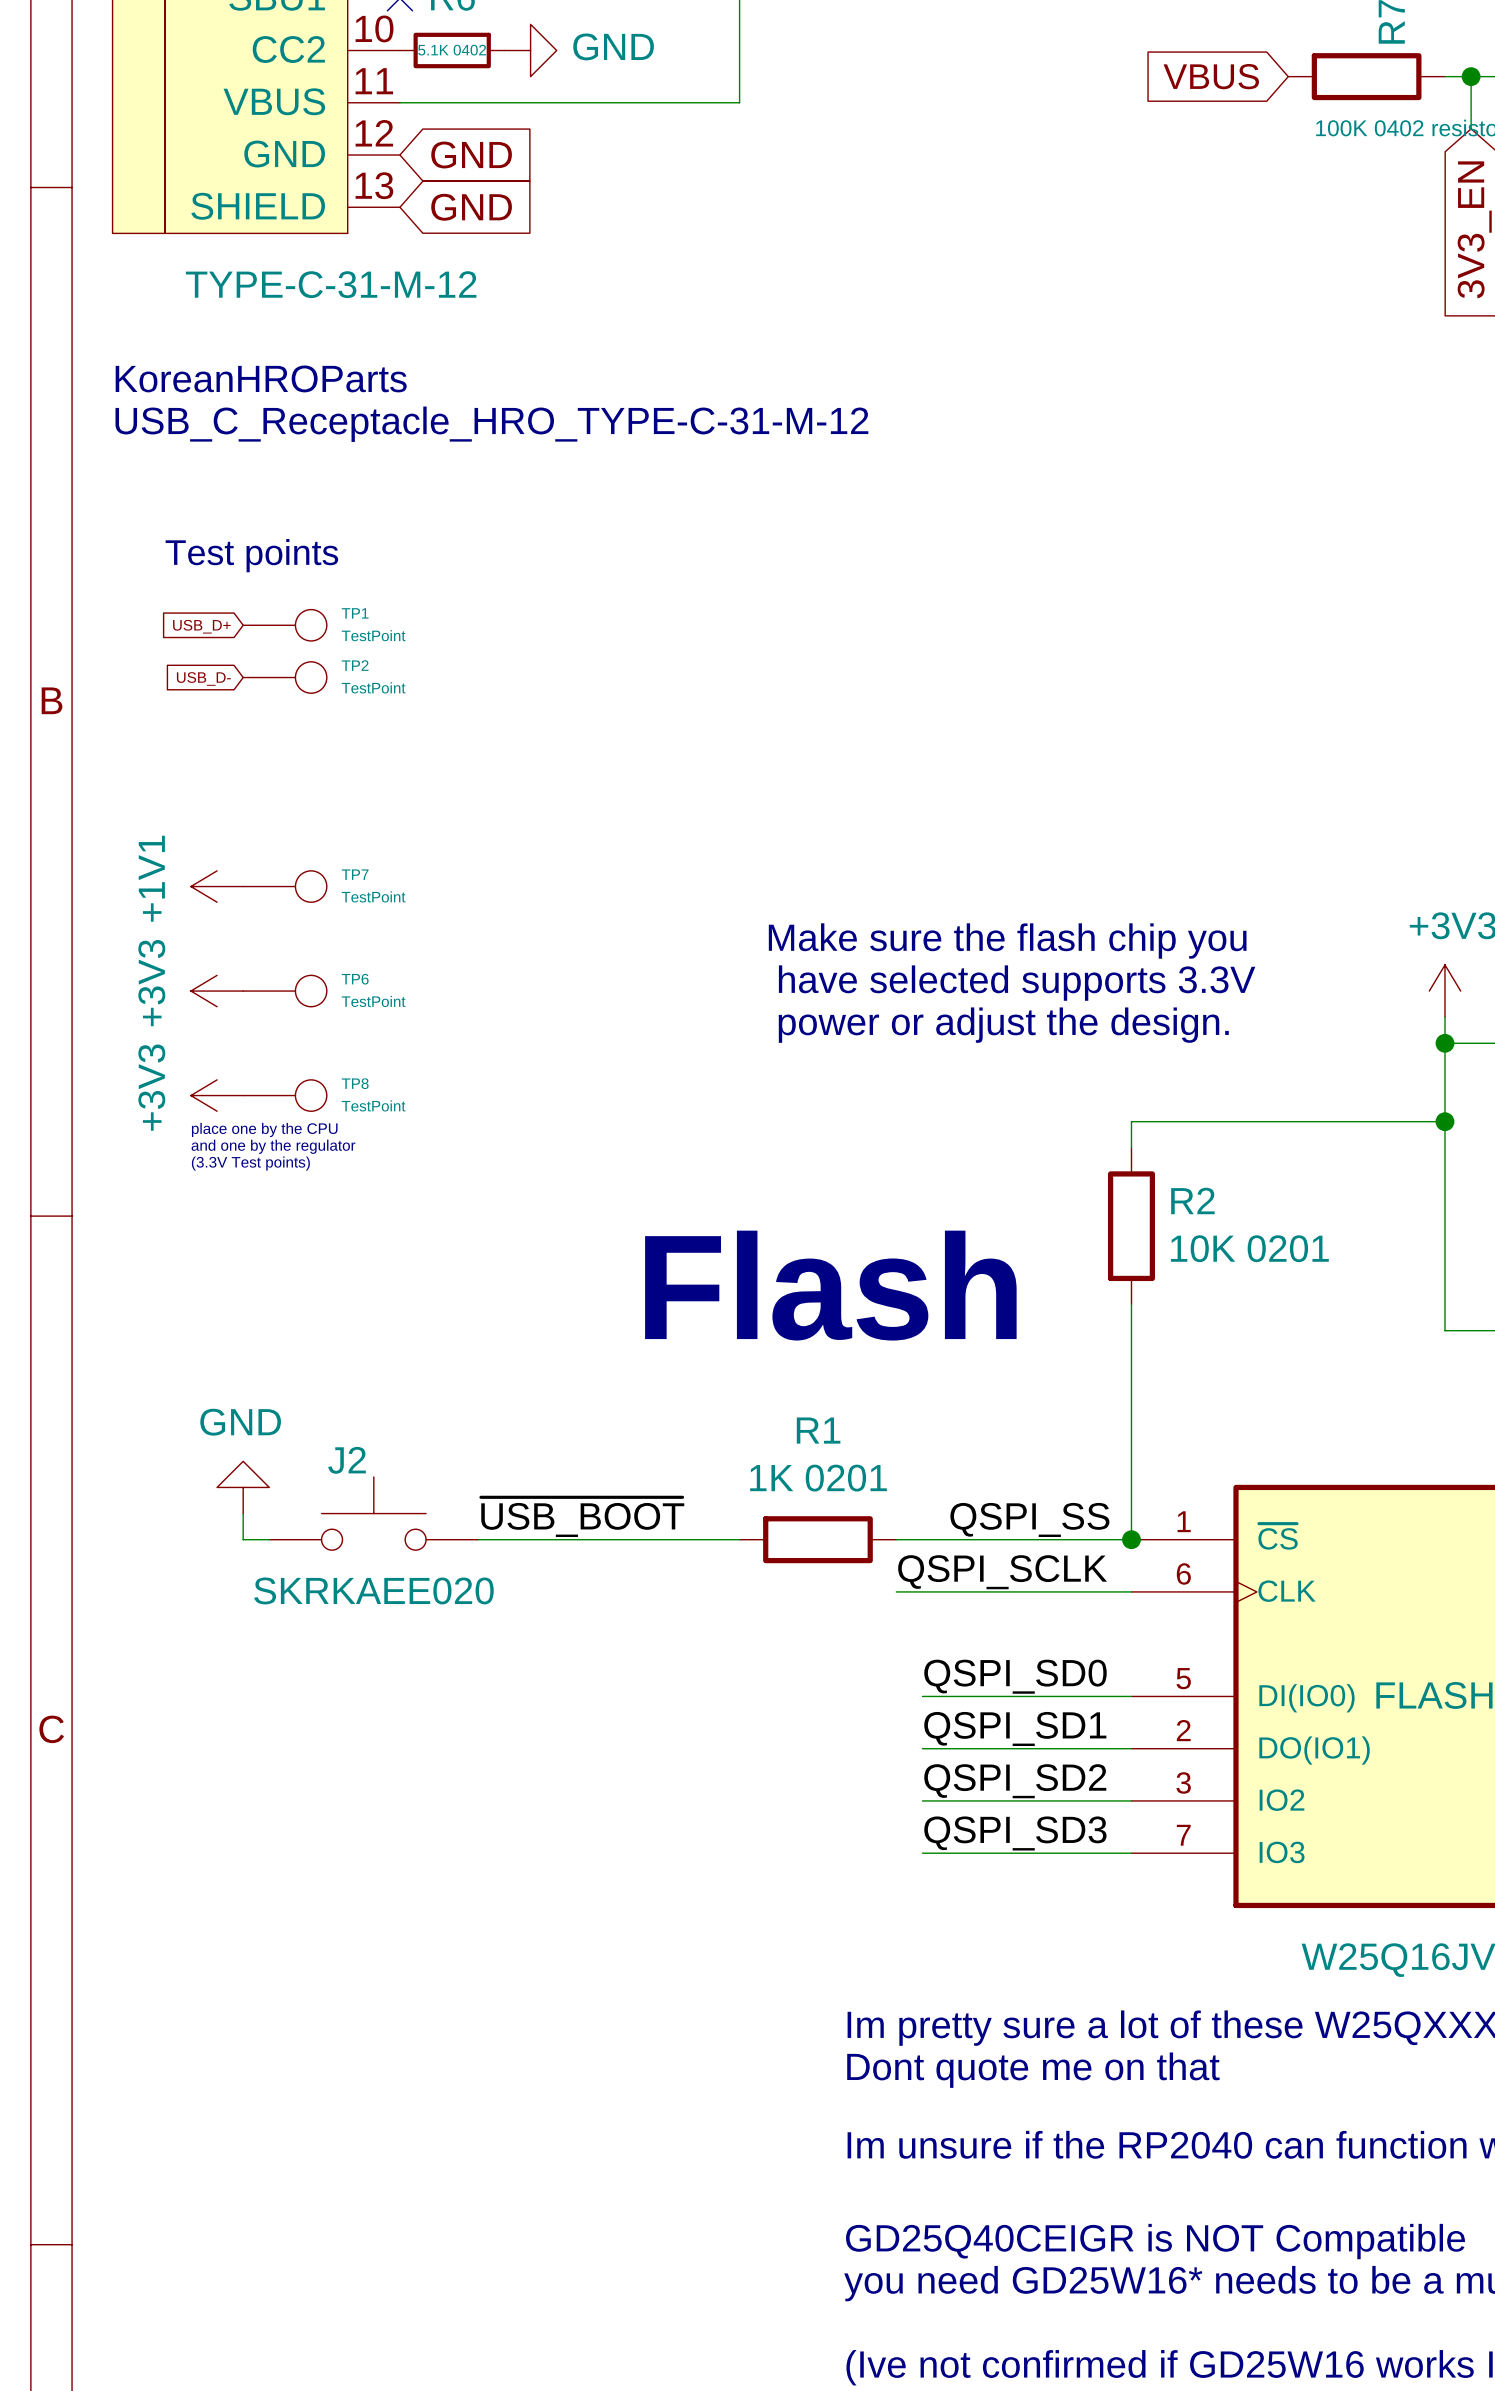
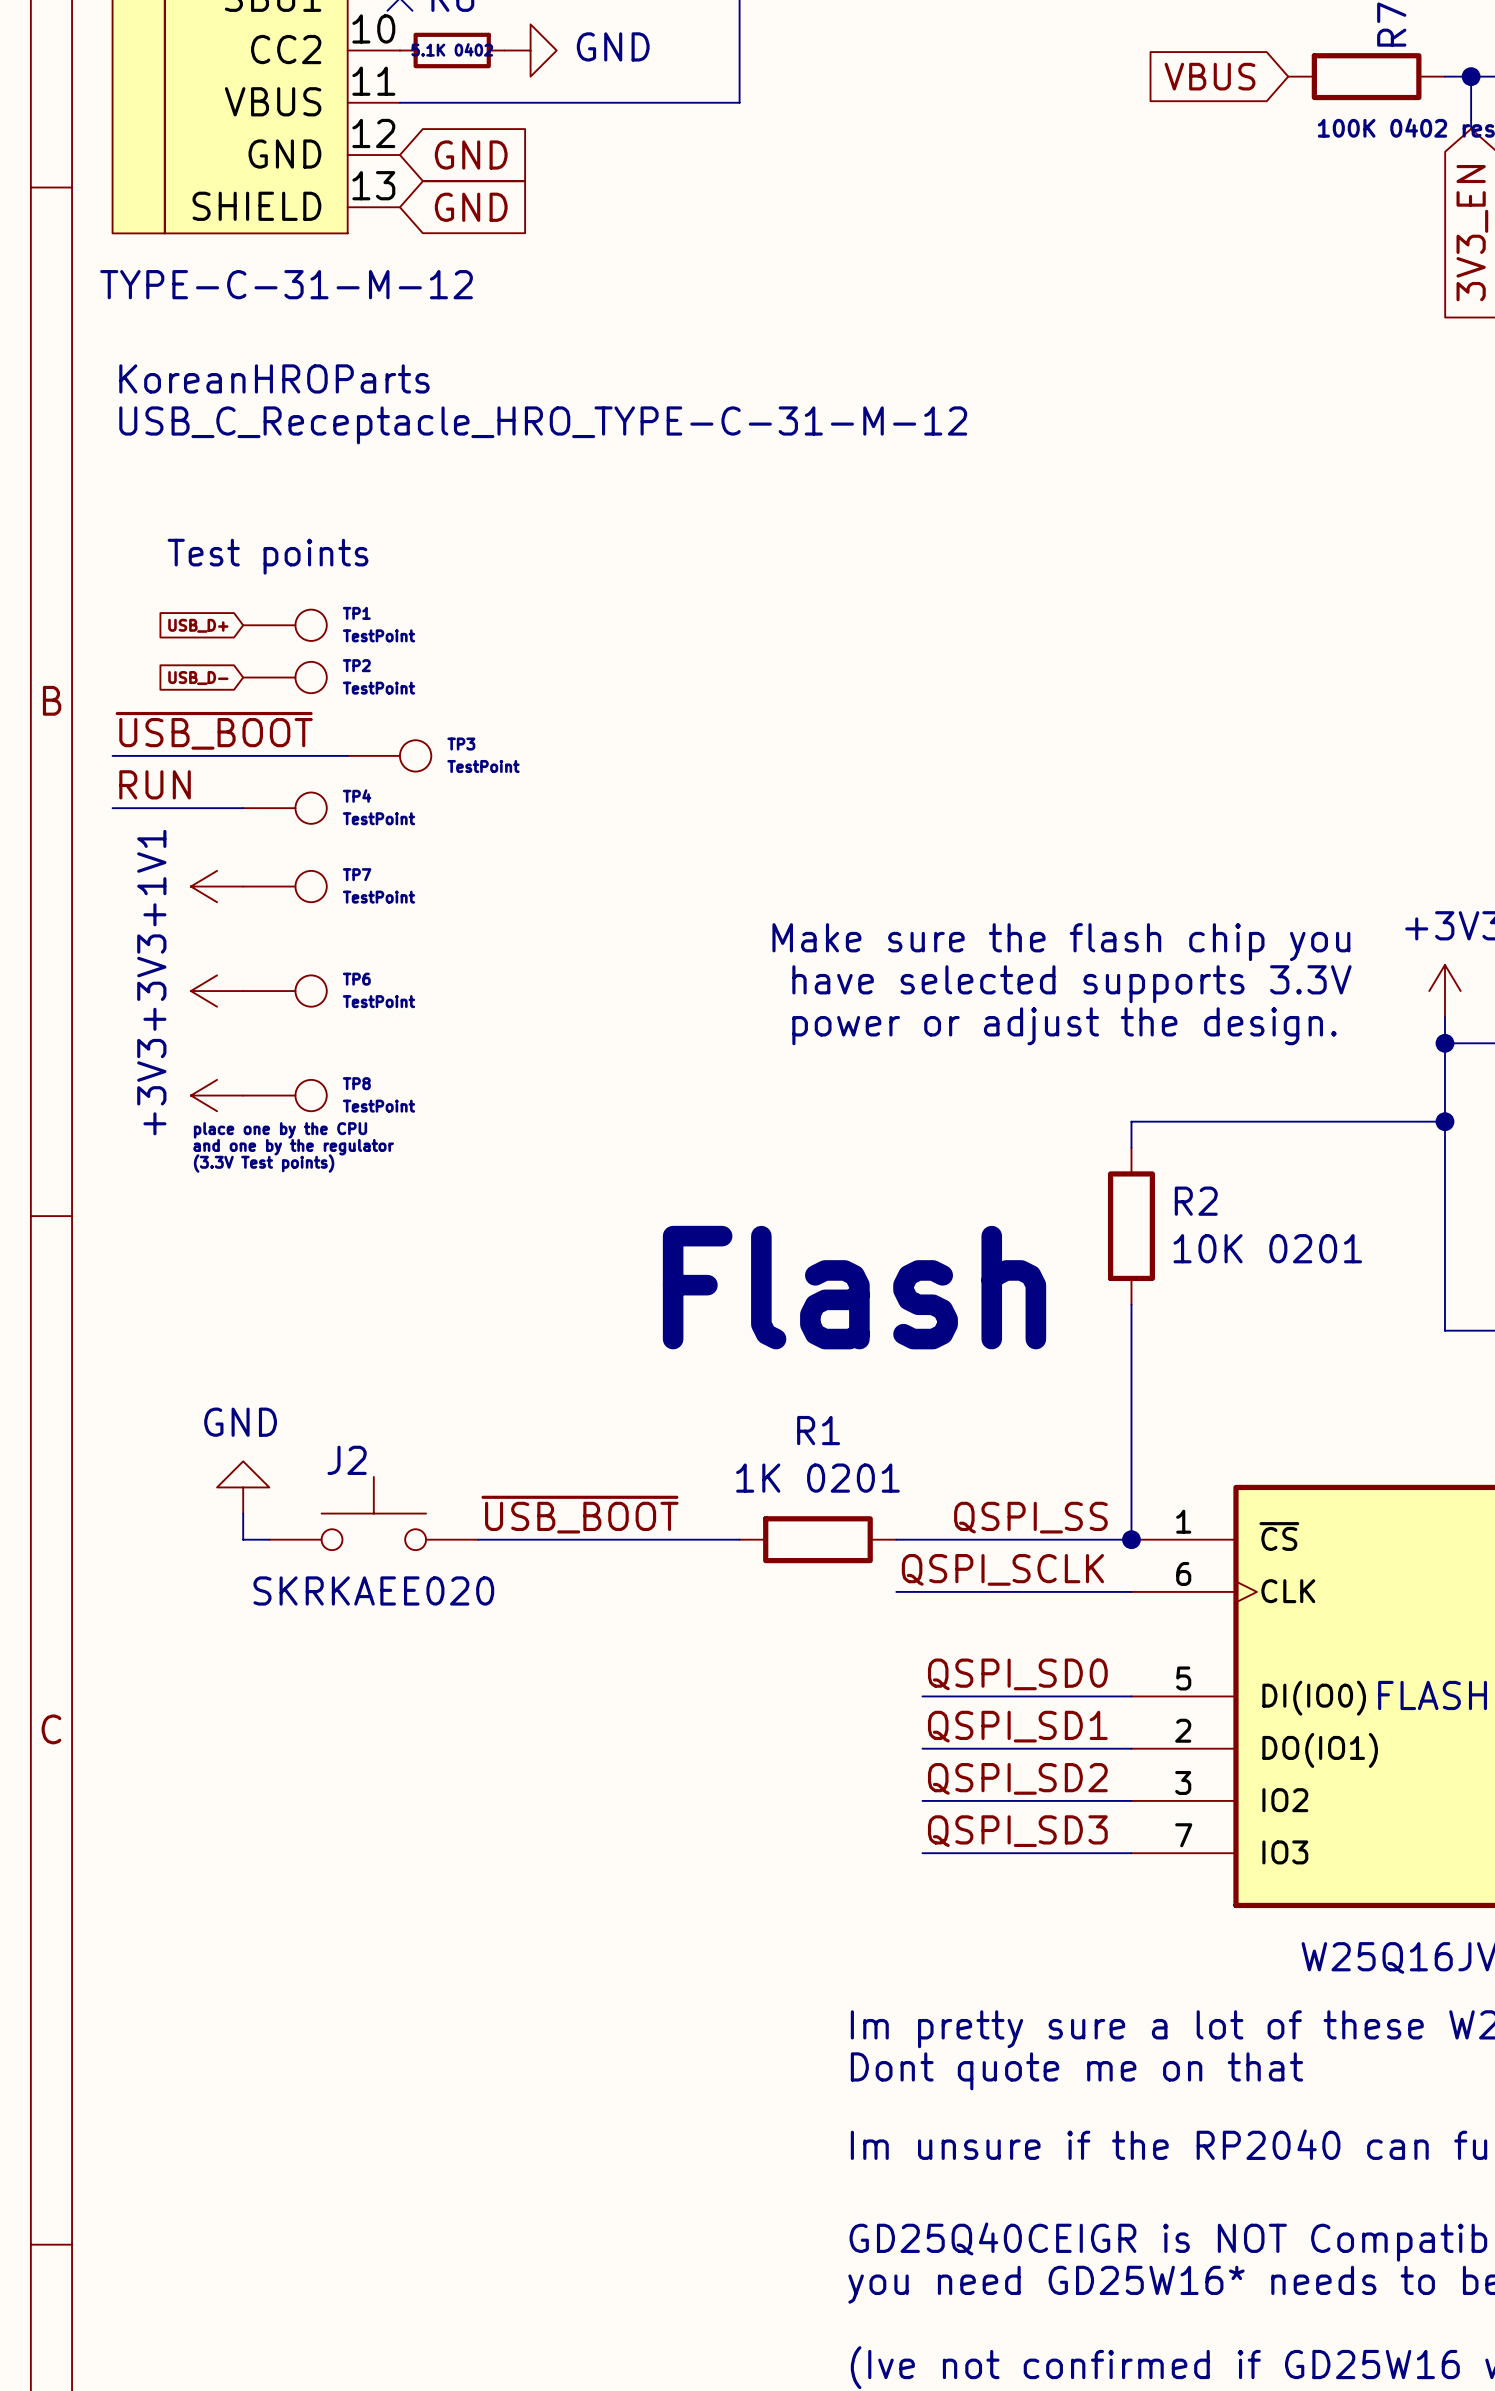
label: none -> ~{USB_BOOT} (214, 730)
wire: none -> (112, 755) (347, 755)
TP3: none -> TestPoint (389, 755)
label: none -> RUN (155, 784)
wire: none -> (112, 808) (243, 808)
TP4: none -> TestPoint (284, 808)

